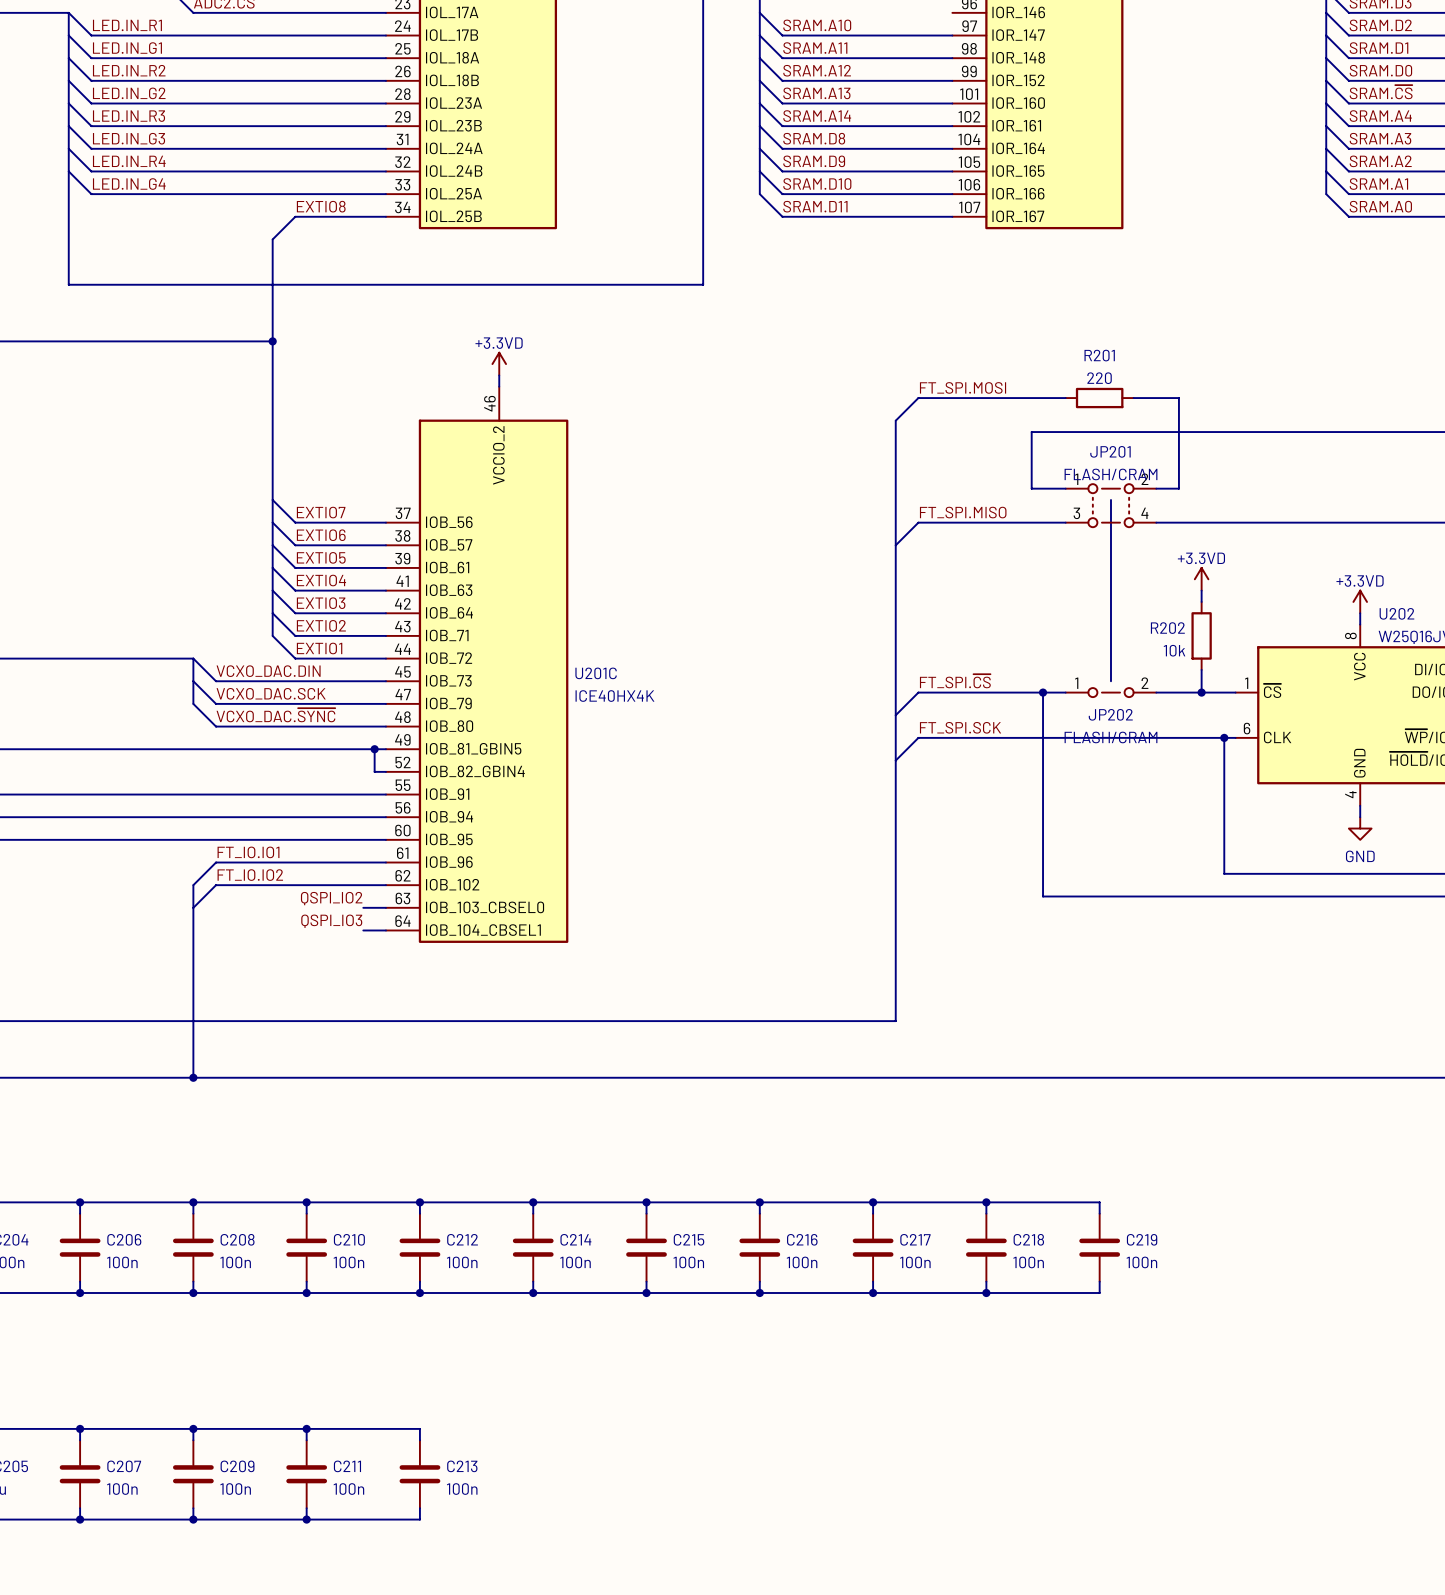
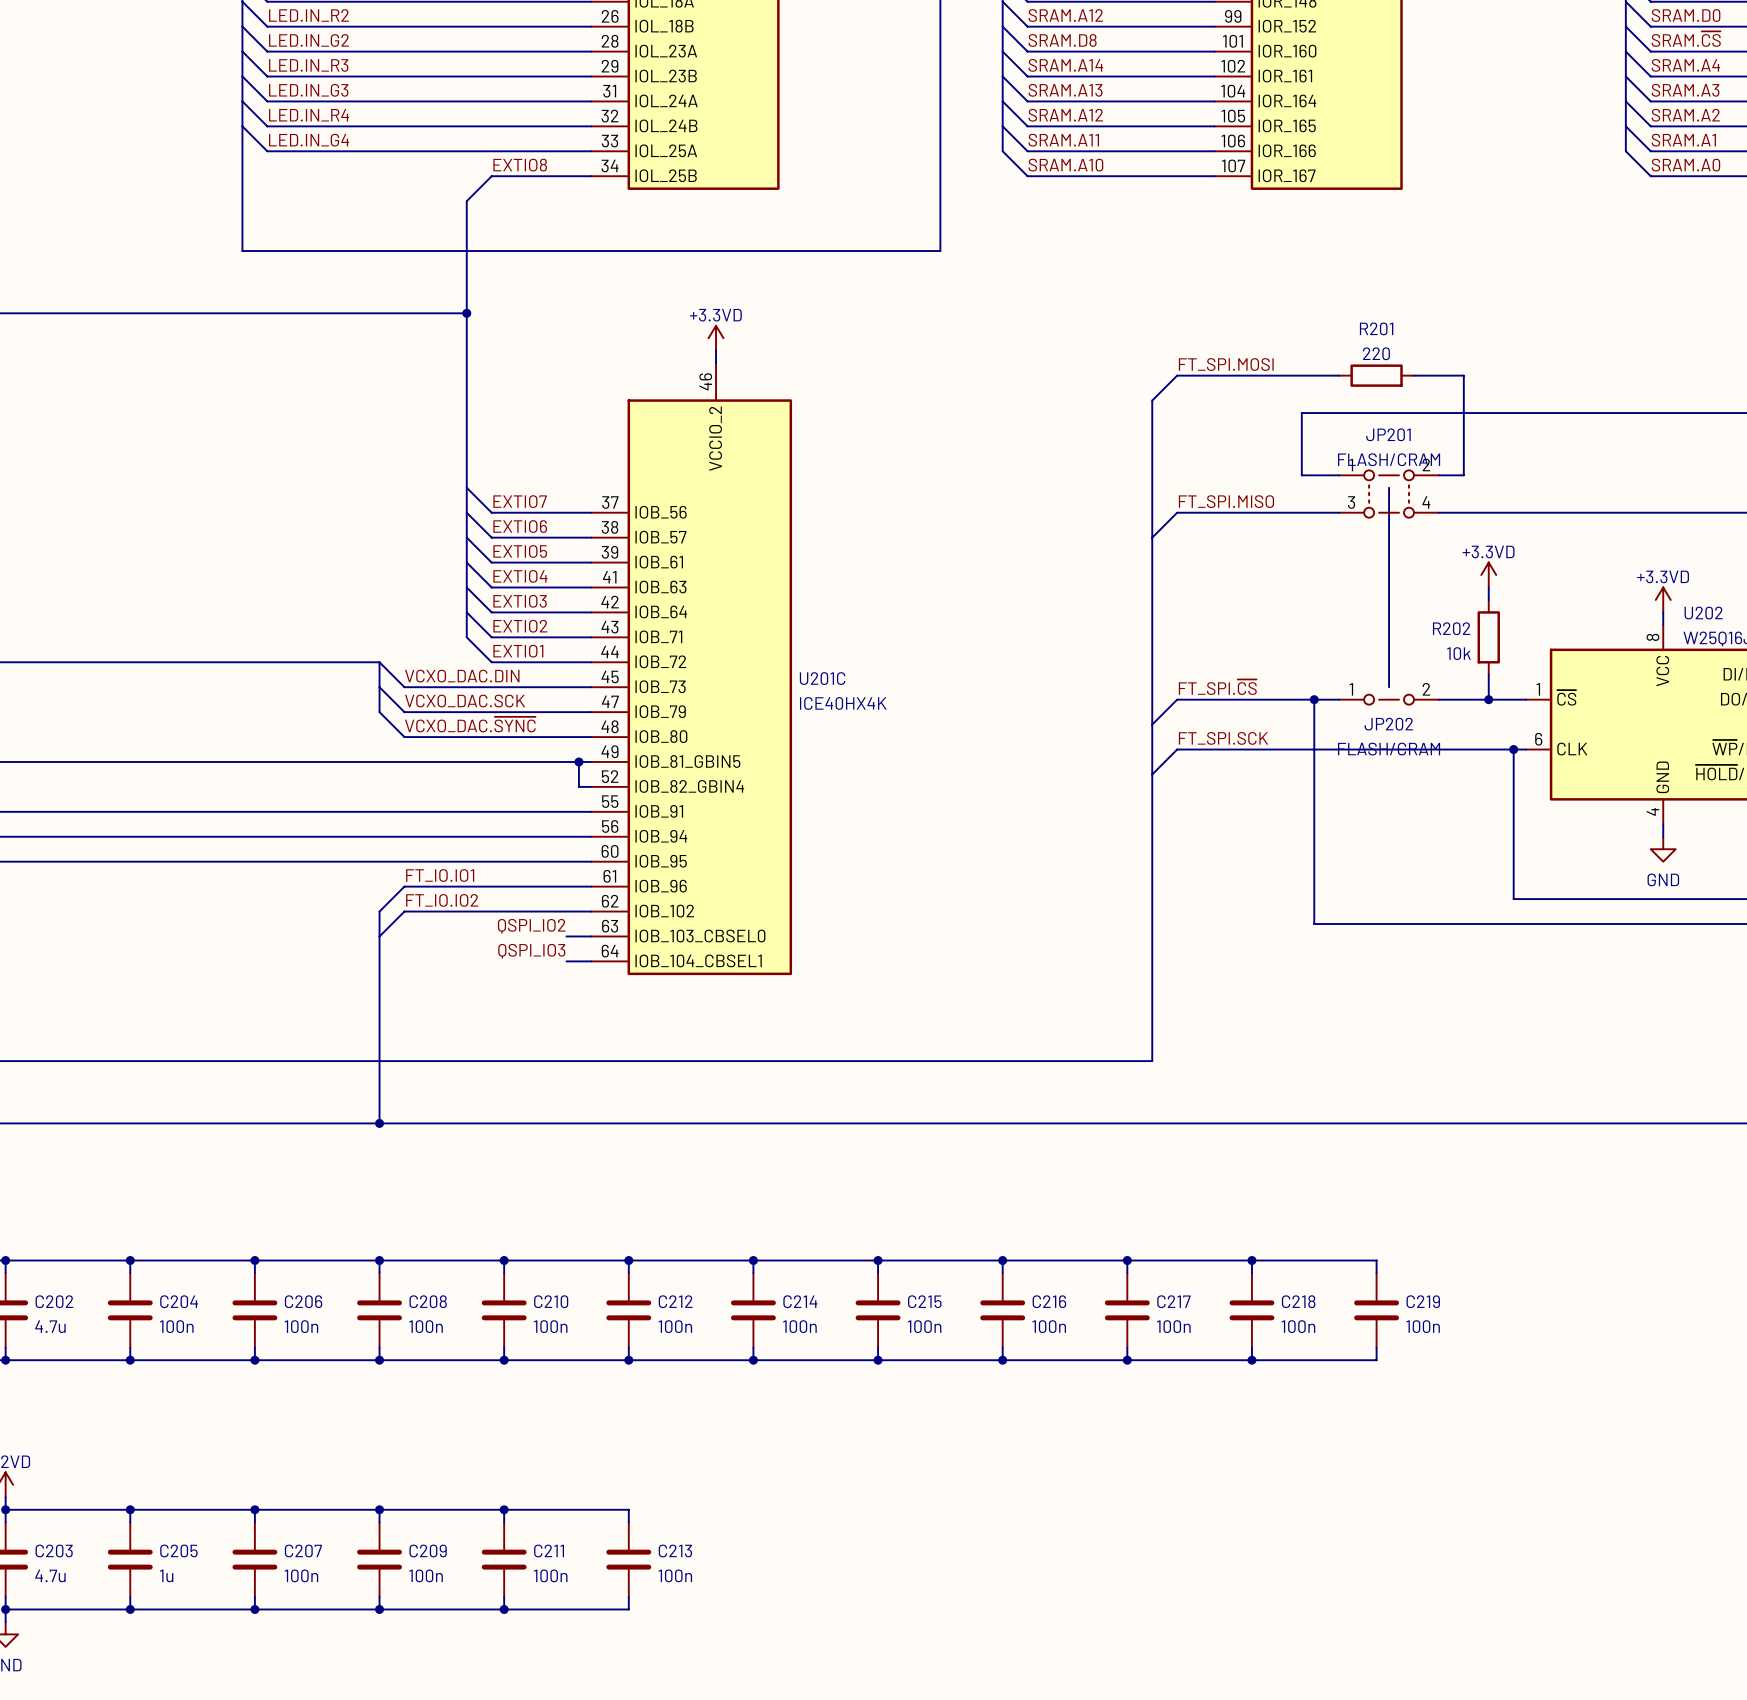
label: SRAM.A13 (816, 93) -> SRAM.D8 (1062, 40)
label: SRAM.D8 (814, 138) -> SRAM.A13 (1065, 90)
label: SRAM.D9 (814, 161) -> SRAM.A12 (1065, 115)
label: SRAM.D10 (817, 184) -> SRAM.A11 (1063, 140)
label: SRAM.D11 (815, 206) -> SRAM.A10 (1065, 165)

